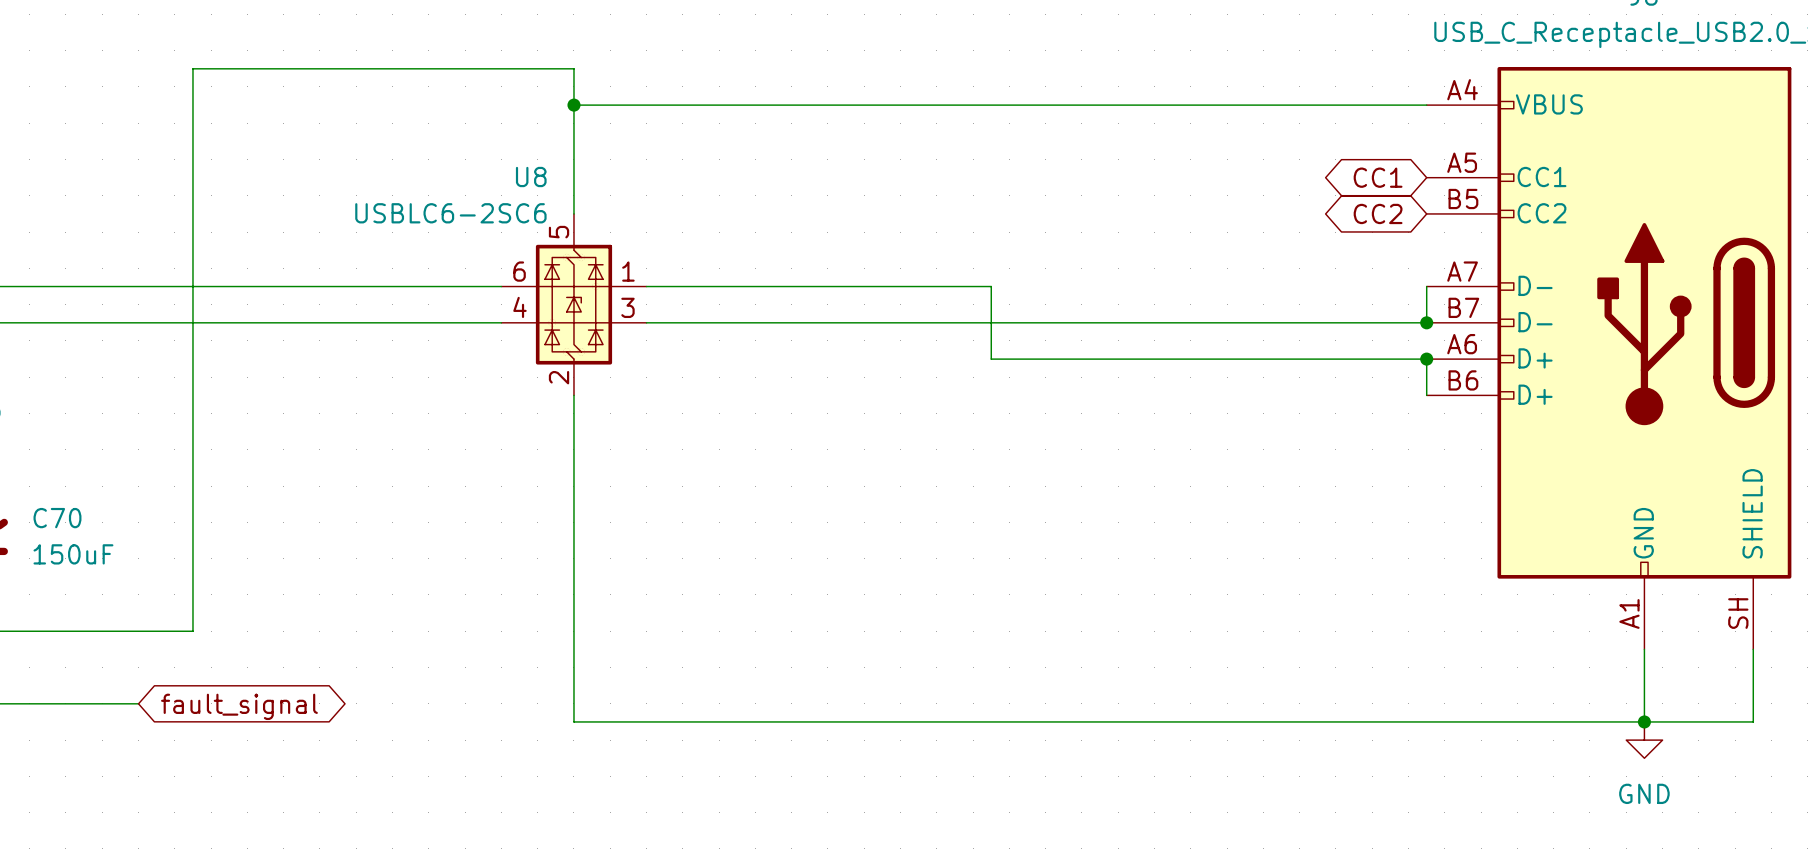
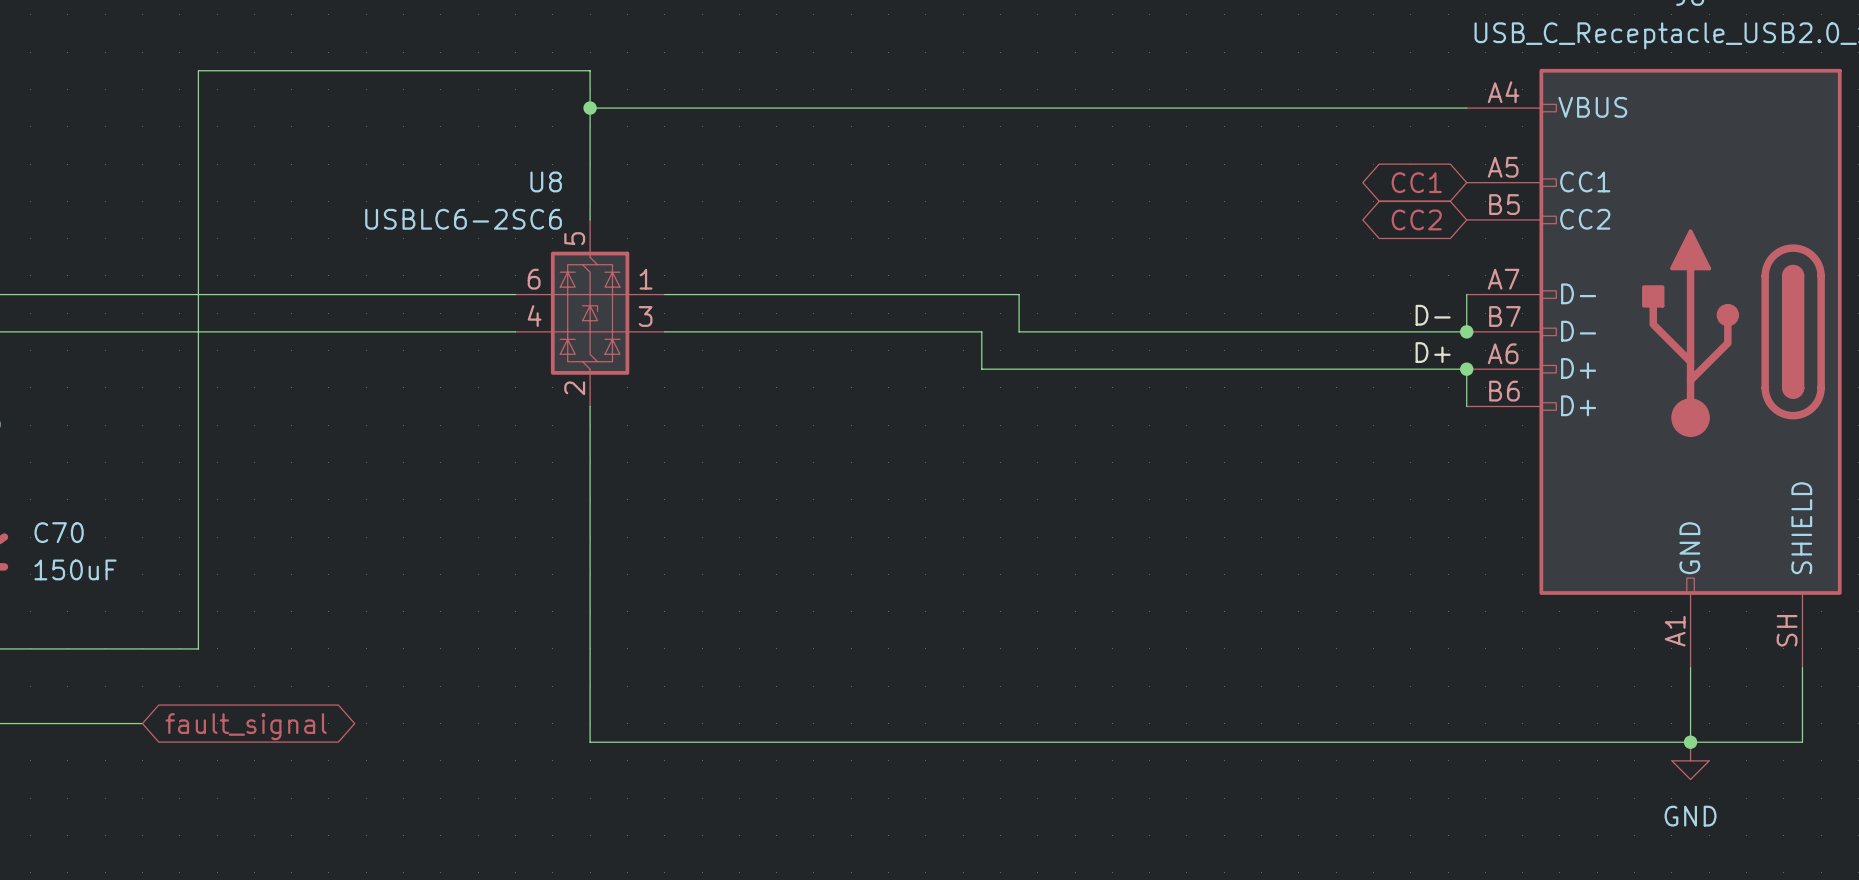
label: none -> D- (1433, 315)
wire: (954, 322) (991, 322) (991, 359) -> (981, 331) (981, 369) (1019, 369)
label: none -> D+ (1433, 352)

